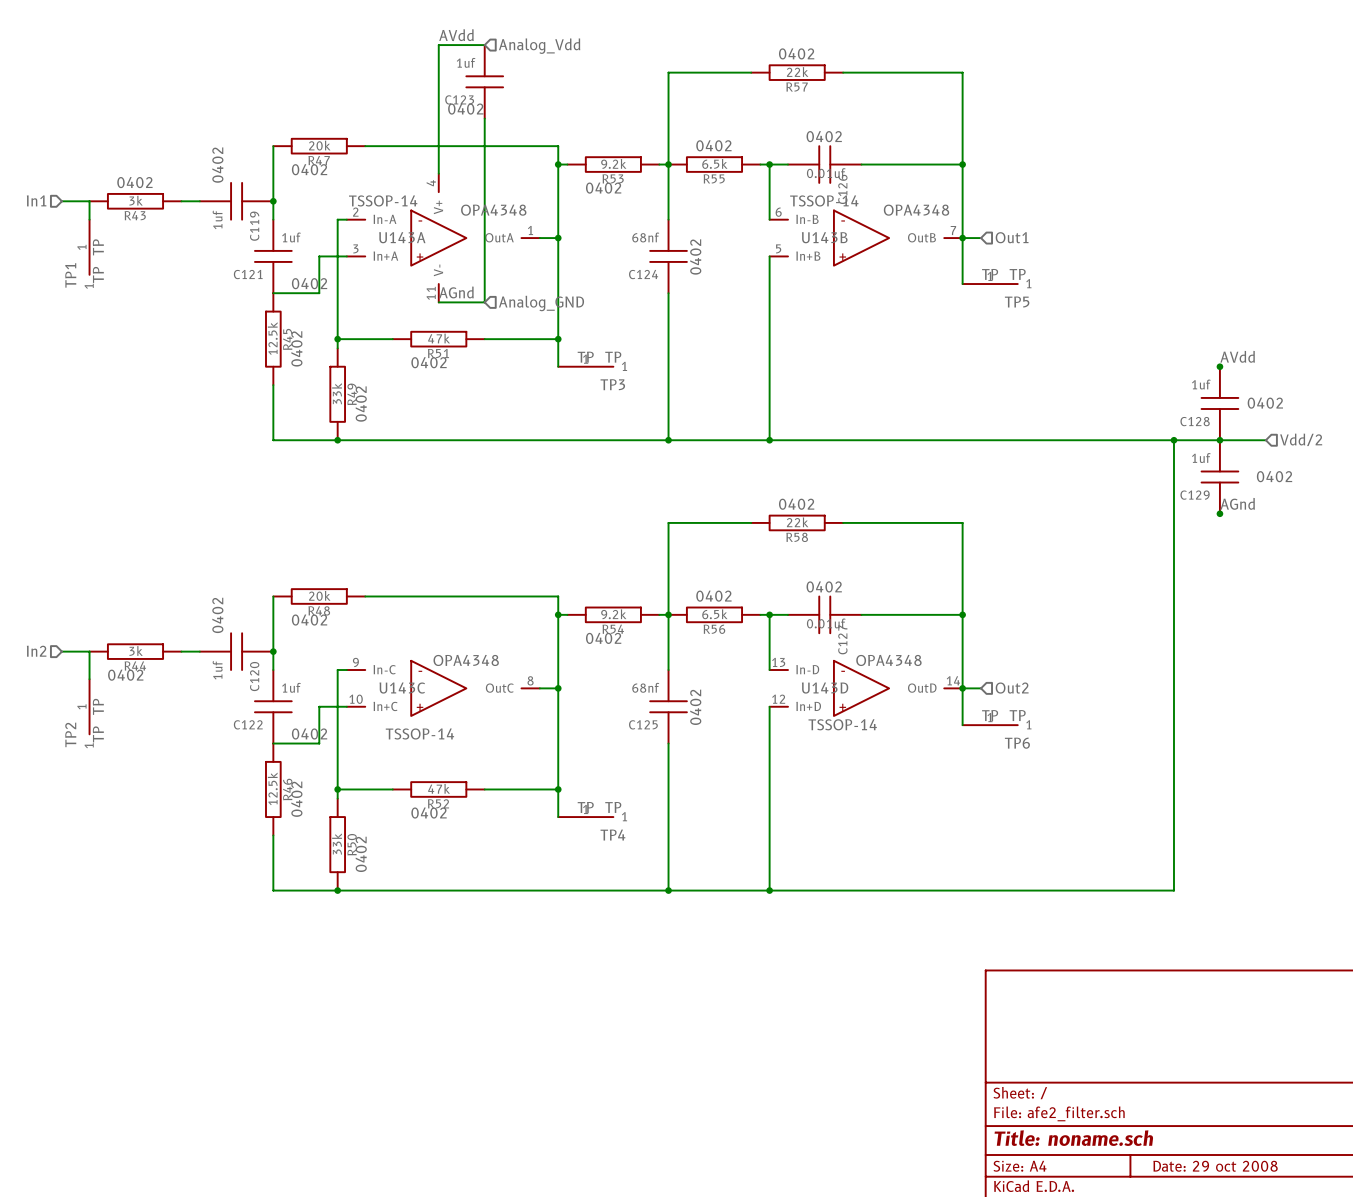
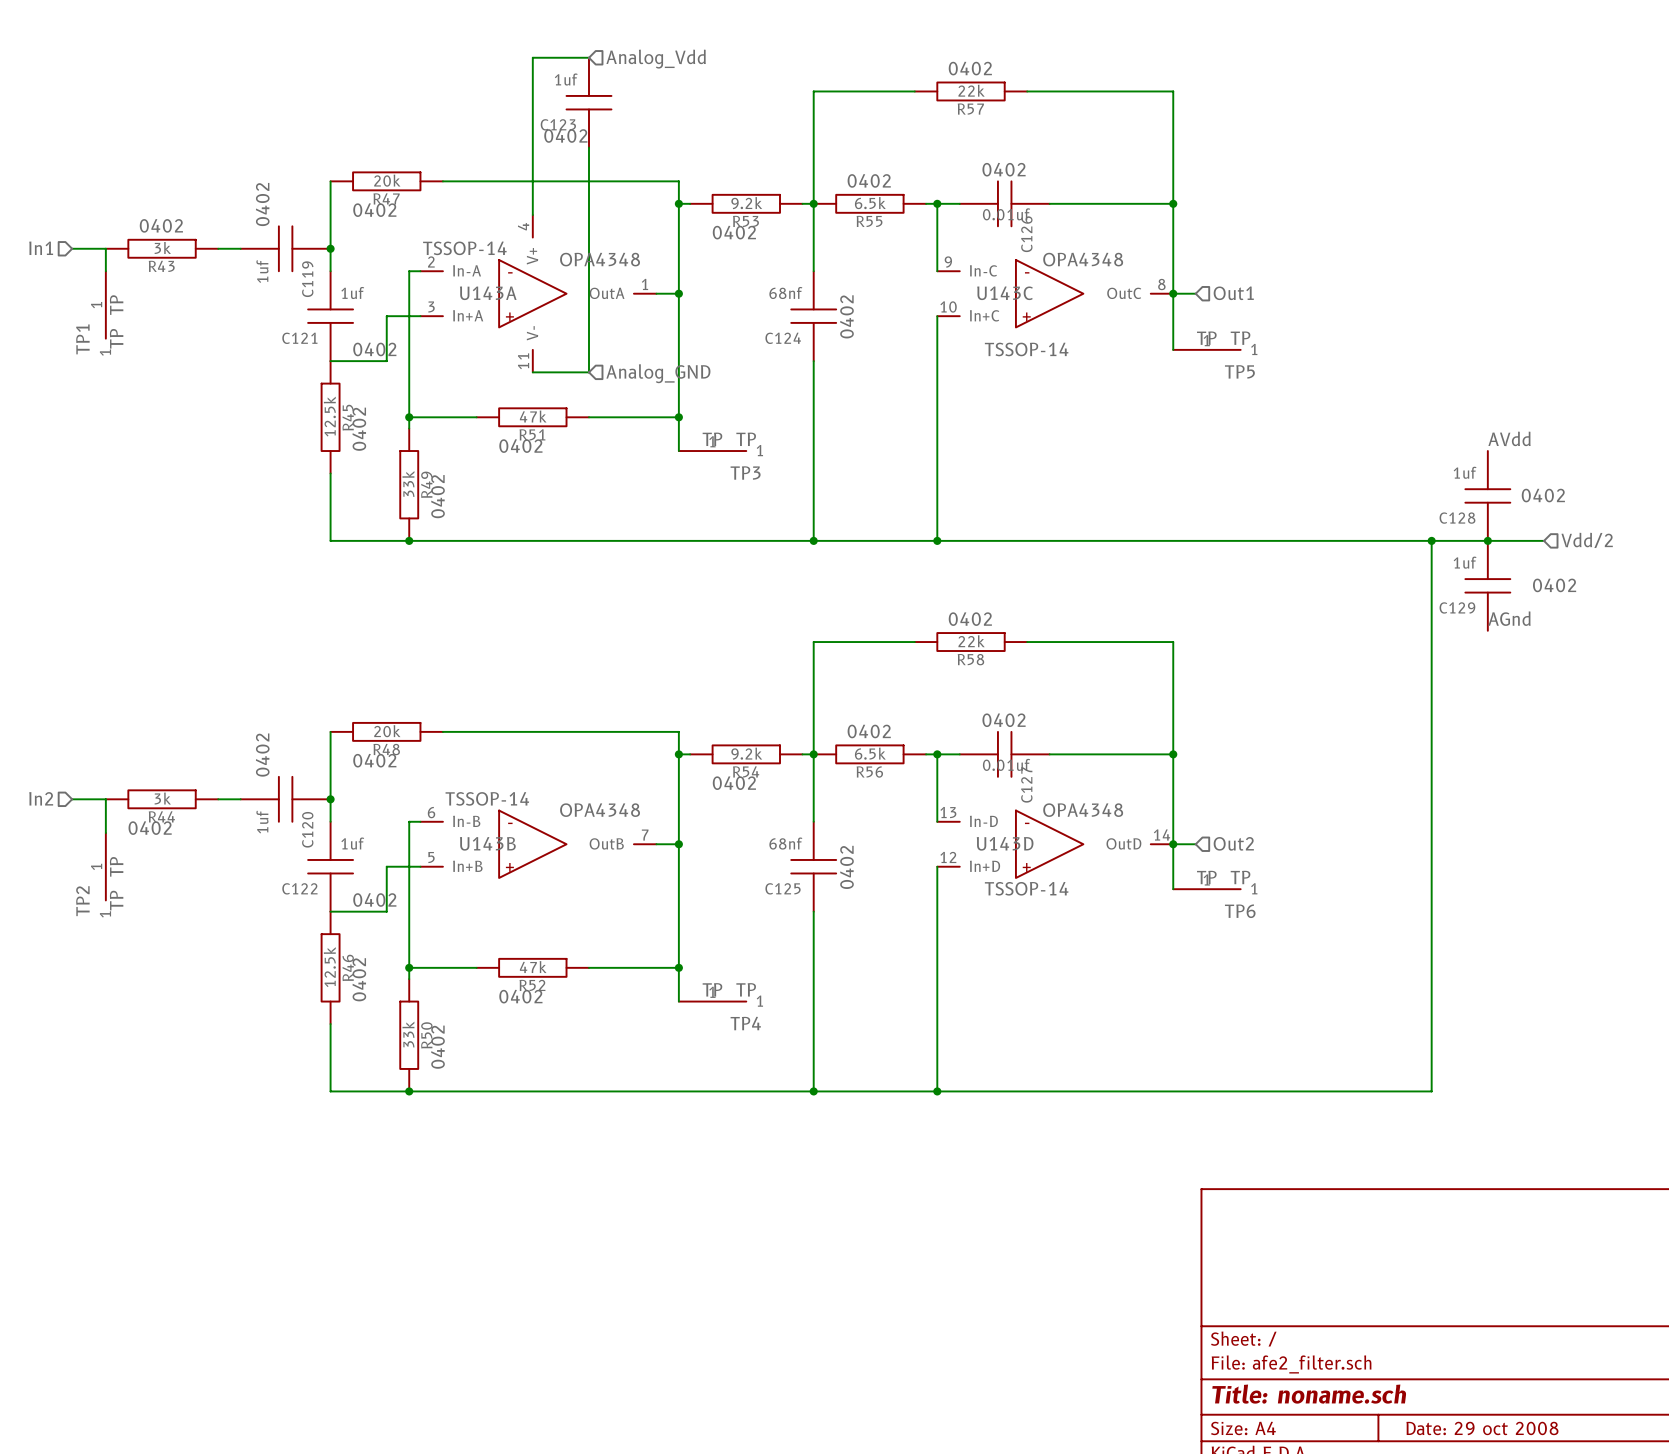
label: AVdd (456, 35) -> none
U143B position: (866, 238) -> (538, 844)
label: AGnd (456, 292) -> none
junction: (1219, 366) -> none
junction: (1219, 513) -> none
U143C position: (443, 688) -> (1055, 293)

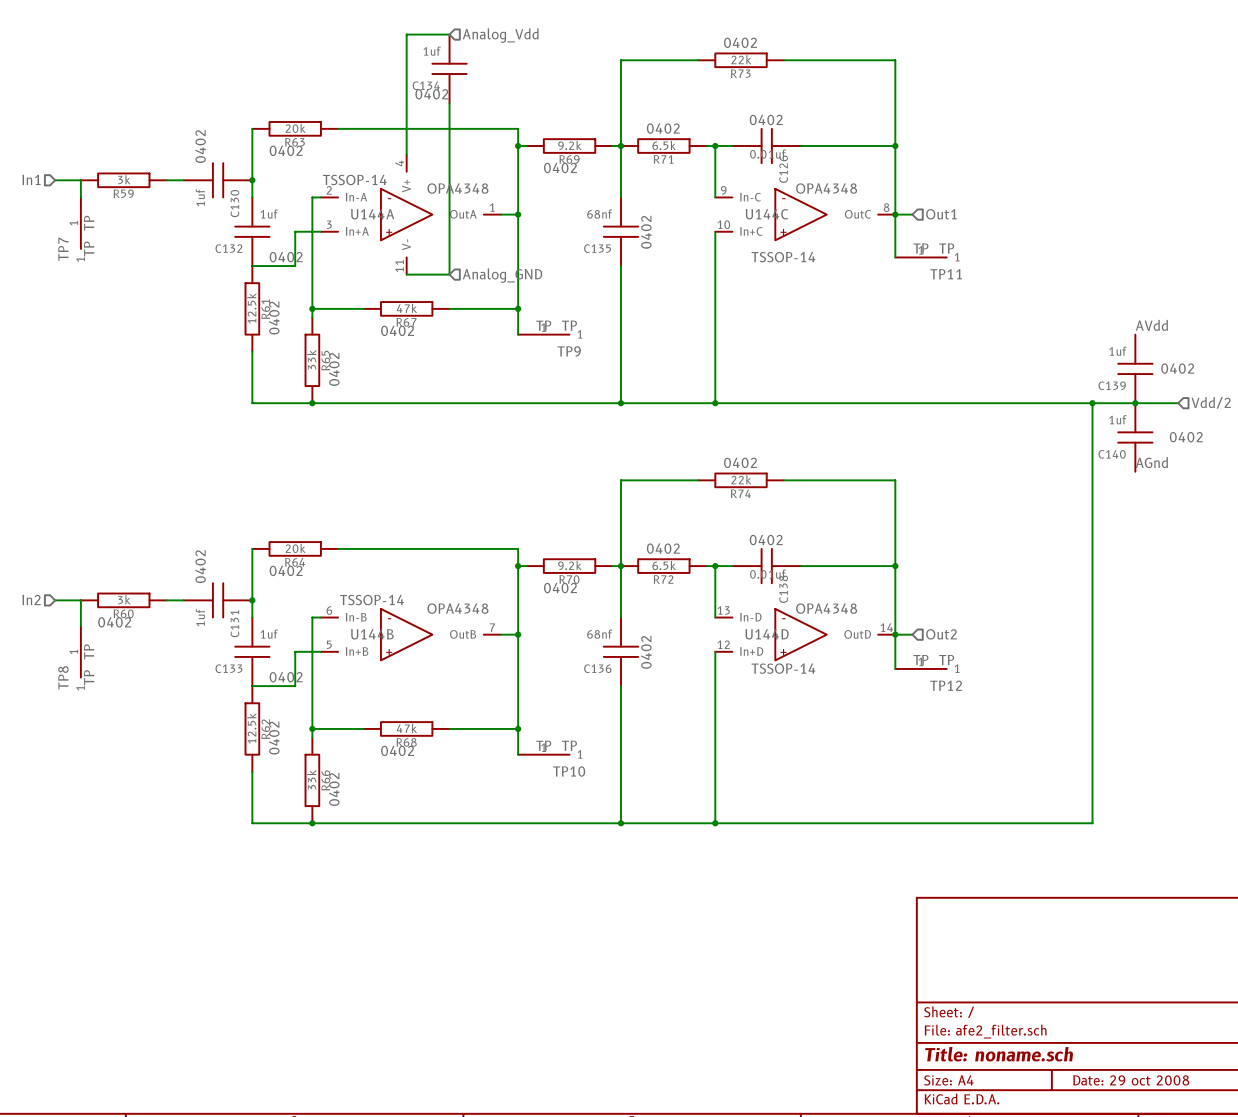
R57 name: R57 (970, 109) -> R73 (740, 73)
C123 name: C123 (558, 124) -> C134 (426, 85)
R47 name: R47 (386, 198) -> R63 (294, 142)
R53 name: R53 (745, 221) -> R69 (569, 159)
R55 name: R55 (869, 221) -> R71 (663, 159)
R43 text: 0402 (161, 225) -> none
R43 name: R43 (161, 266) -> R59 (123, 193)
C119 name: C119 (307, 279) -> C130 (234, 203)
U143A name: U143A (488, 293) -> U144A (372, 214)
U143C name: U143C (1005, 293) -> U144C (766, 214)
C121 name: C121 (299, 338) -> C132 (228, 248)
C124 name: C124 (783, 338) -> C135 (597, 248)
TP1 name: TP1 (82, 339) -> TP7 (63, 249)
TP5 name: TP5 (1239, 371) -> TP11 (946, 274)
R45 name: R45 (348, 417) -> R61 (265, 309)
R51 name: R51 (532, 434) -> R67 (406, 322)
TP3 name: TP3 (745, 473) -> TP9 (569, 351)
R49 name: R49 (426, 484) -> R65 (325, 360)
C128 name: C128 (1457, 518) -> C139 (1112, 385)
C129 name: C129 (1457, 607) -> C140 (1112, 454)
R58 name: R58 (970, 659) -> R74 (740, 493)
R48 name: R48 (386, 749) -> R64 (295, 562)
R54 name: R54 (746, 771) -> R70 (569, 579)
R56 name: R56 (869, 772) -> R72 (663, 579)
C127 name: C127 (1026, 784) -> C138 (783, 589)
R44 name: R44 (161, 816) -> R60 (123, 613)
C120 name: C120 (307, 829) -> C131 (234, 623)
U143B name: U143B (487, 843) -> U144B (372, 634)
U143D name: U143D (1005, 843) -> U144D (767, 634)
C122 name: C122 (299, 888) -> C133 (228, 668)
C125 name: C125 (783, 888) -> C136 (597, 668)
TP2 name: TP2 (82, 901) -> TP8 (63, 677)
TP6 name: TP6 (1240, 911) -> TP12 (946, 685)
R46 name: R46 (348, 967) -> R62 (265, 729)
R52 name: R52 (532, 985) -> R68 (406, 742)
TP4 name: TP4 (745, 1023) -> TP10 (569, 771)
R50 name: R50 (426, 1035) -> R66 (325, 780)

